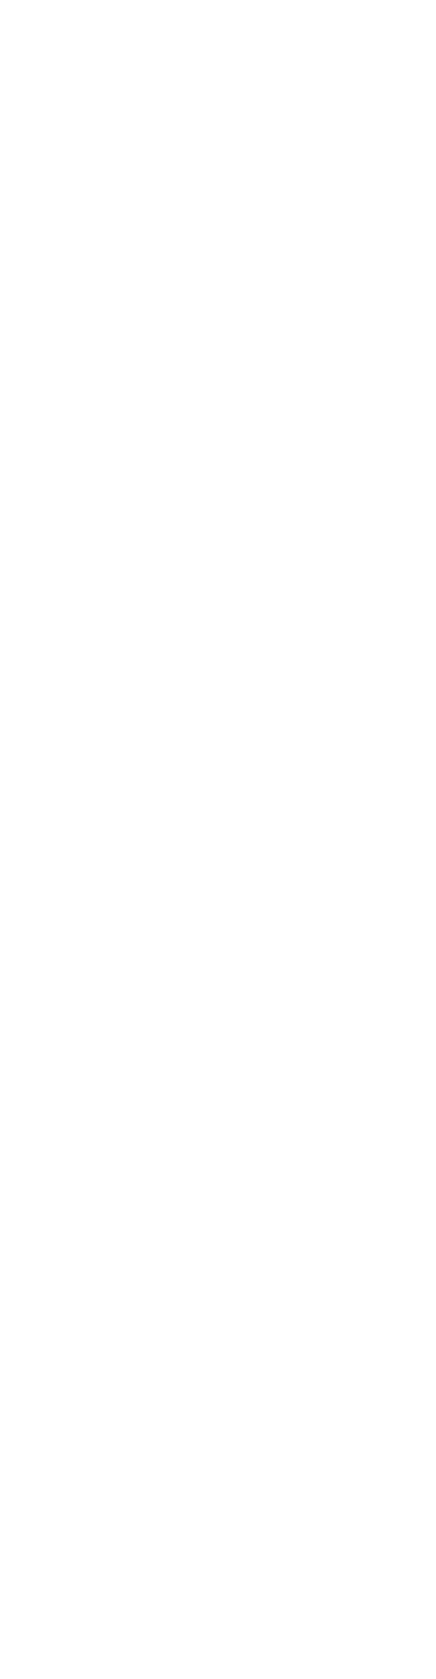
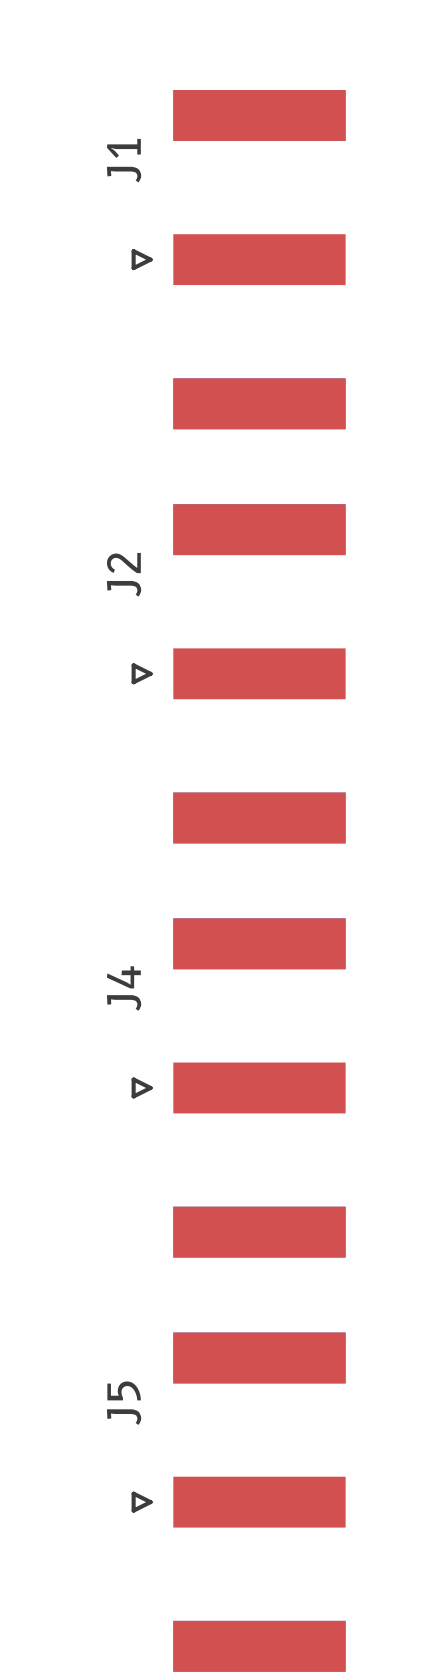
J1: none -> (238, 259)
J2: none -> (238, 673)
J4: none -> (238, 1087)
J5: none -> (238, 1502)

